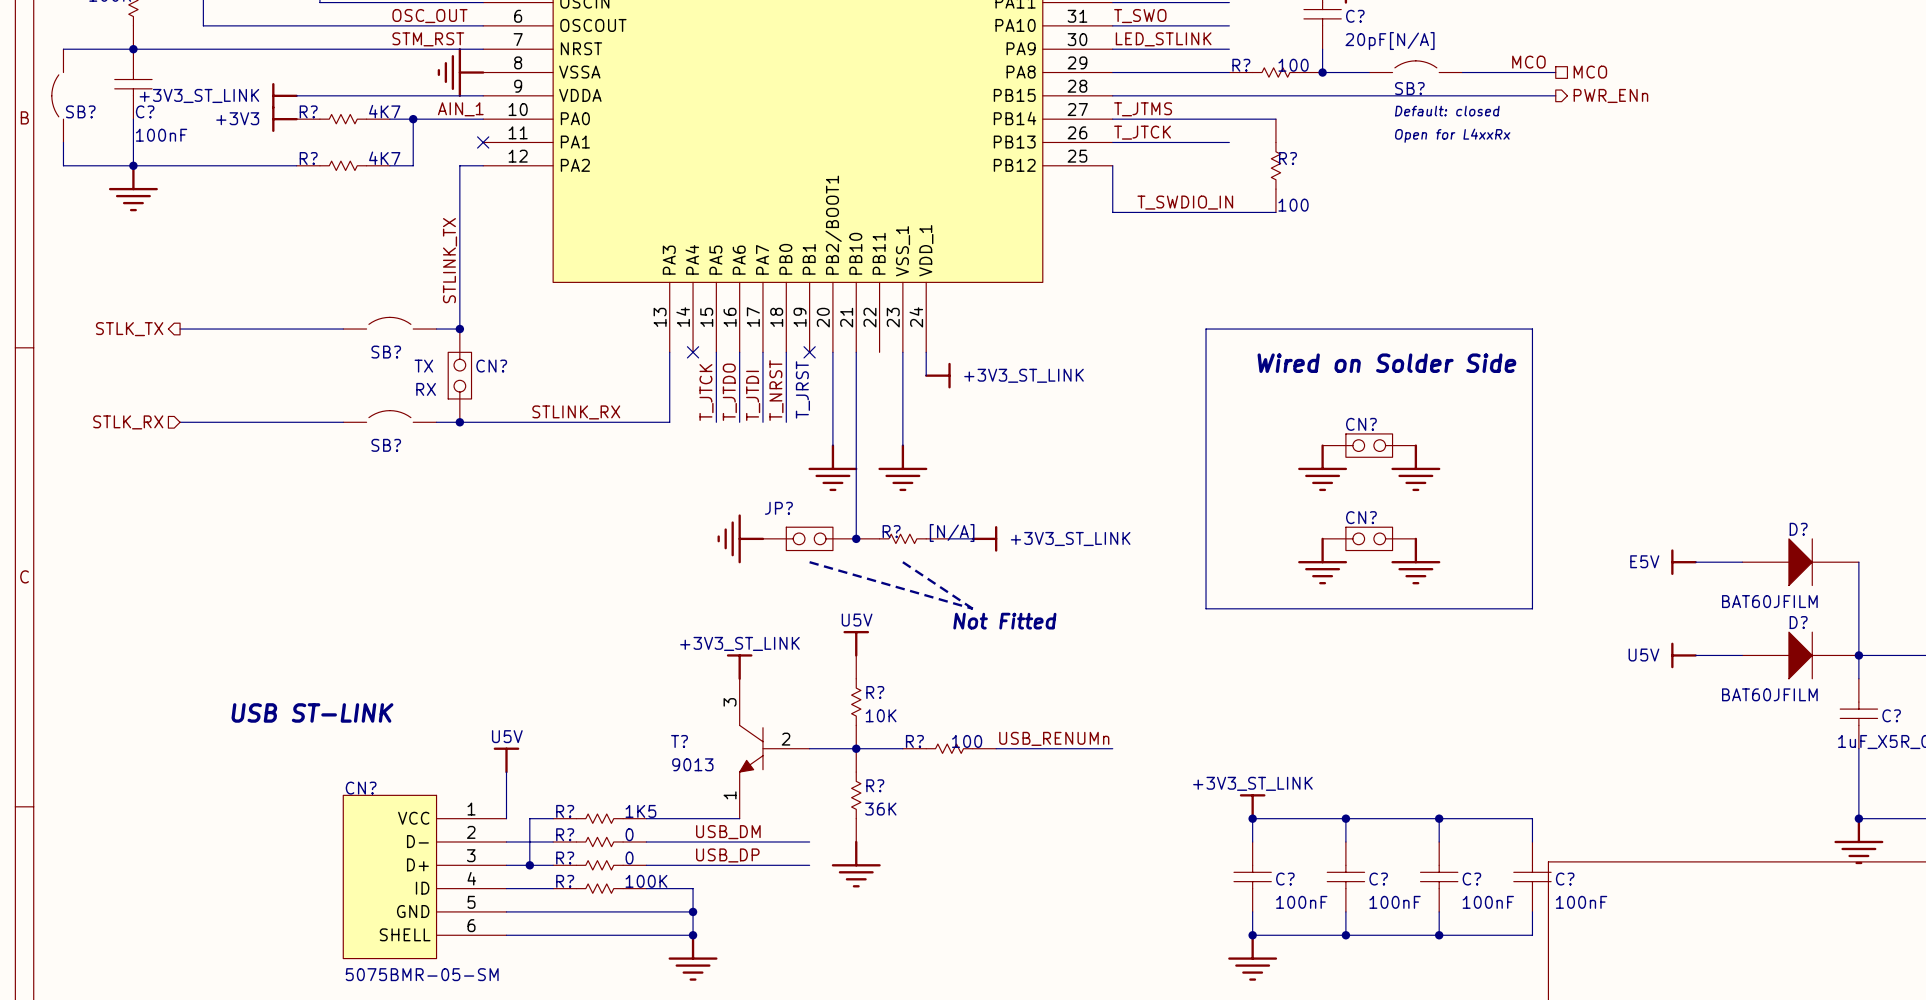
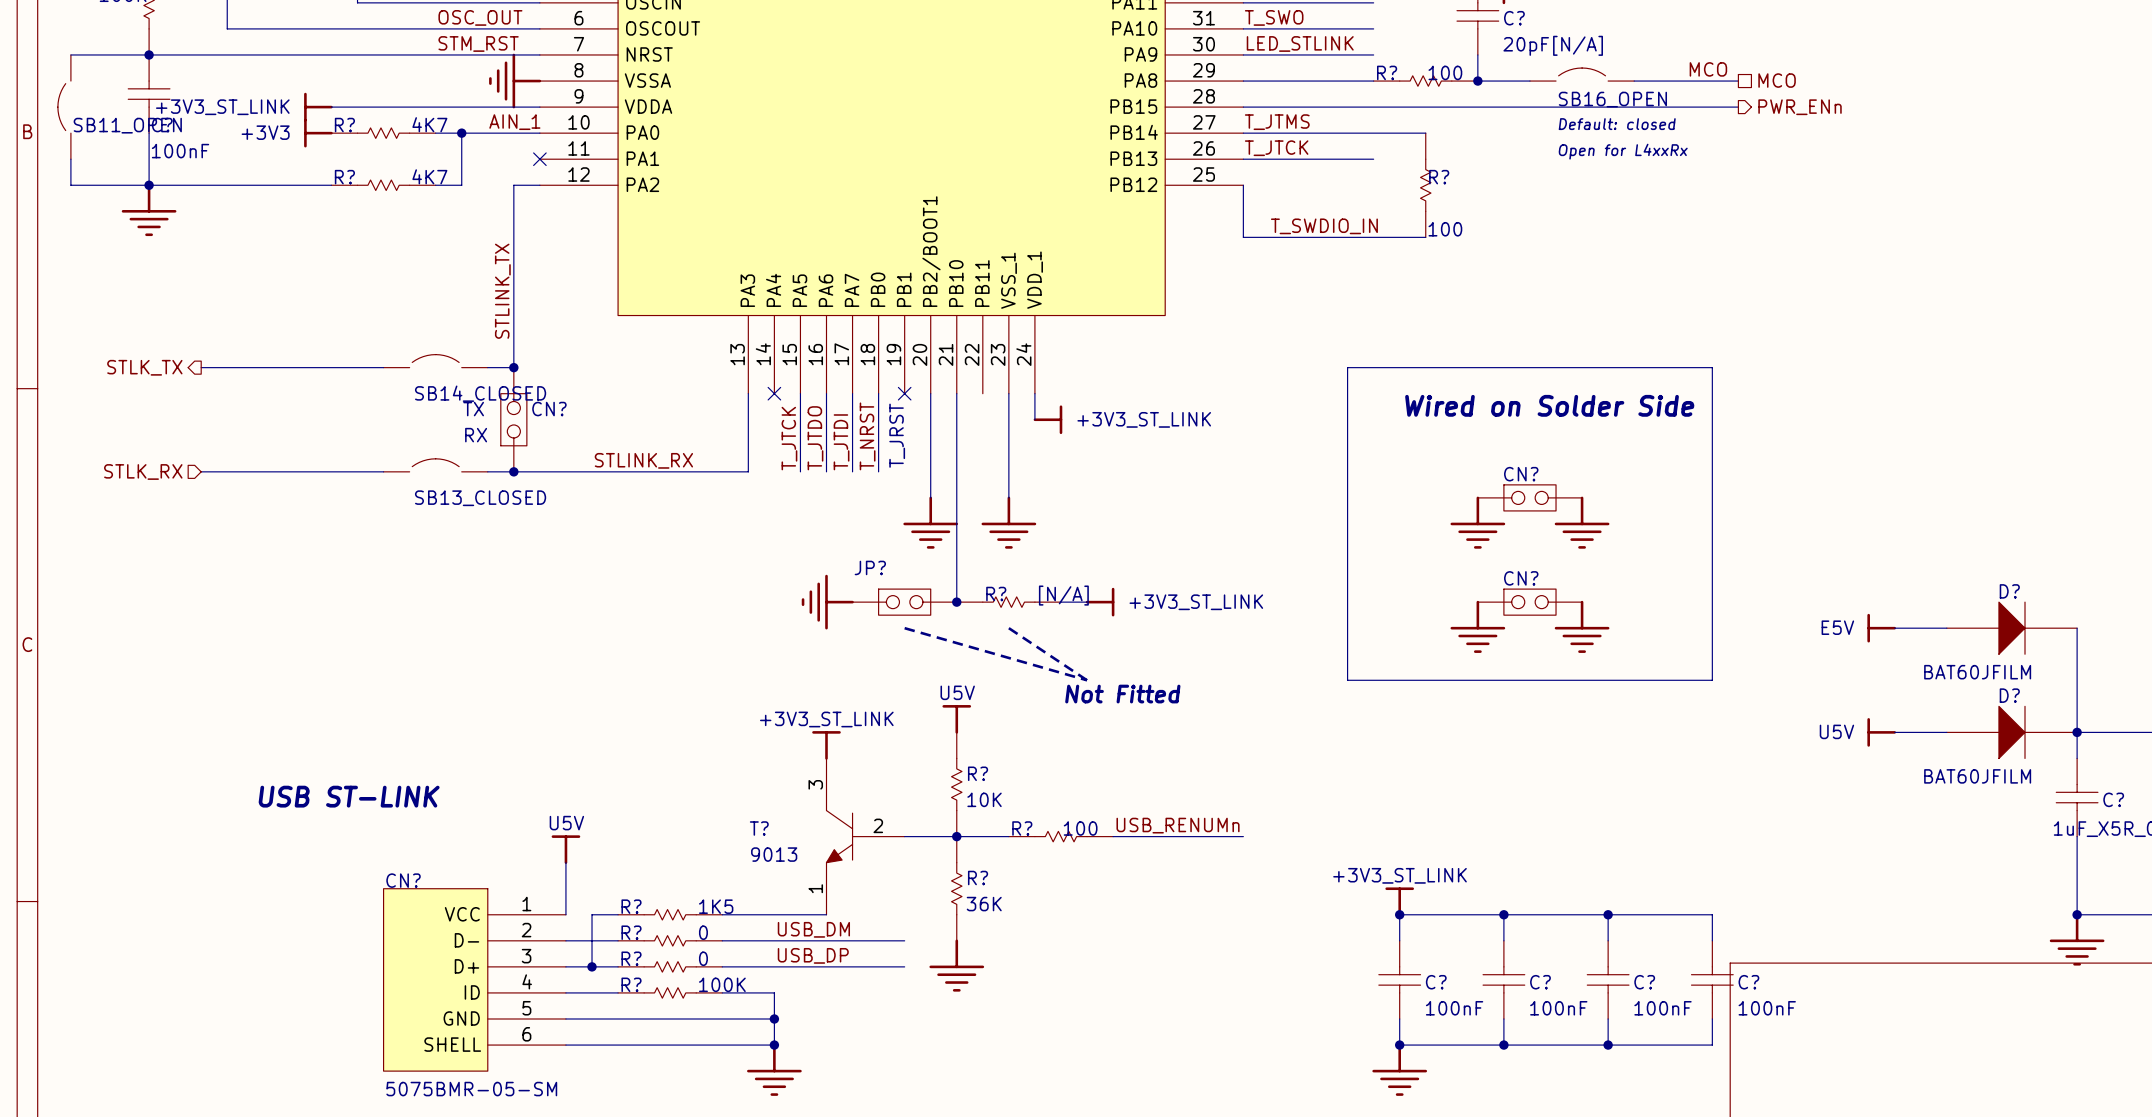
SB? name: SB? (1409, 88) -> SB16_OPEN (1612, 99)
SB? name: SB? (80, 111) -> SB11_OPEN (127, 125)
SB? name: SB? (386, 352) -> SB14_CLOSED (480, 393)
SB? name: SB? (386, 445) -> SB13_CLOSED (480, 498)

